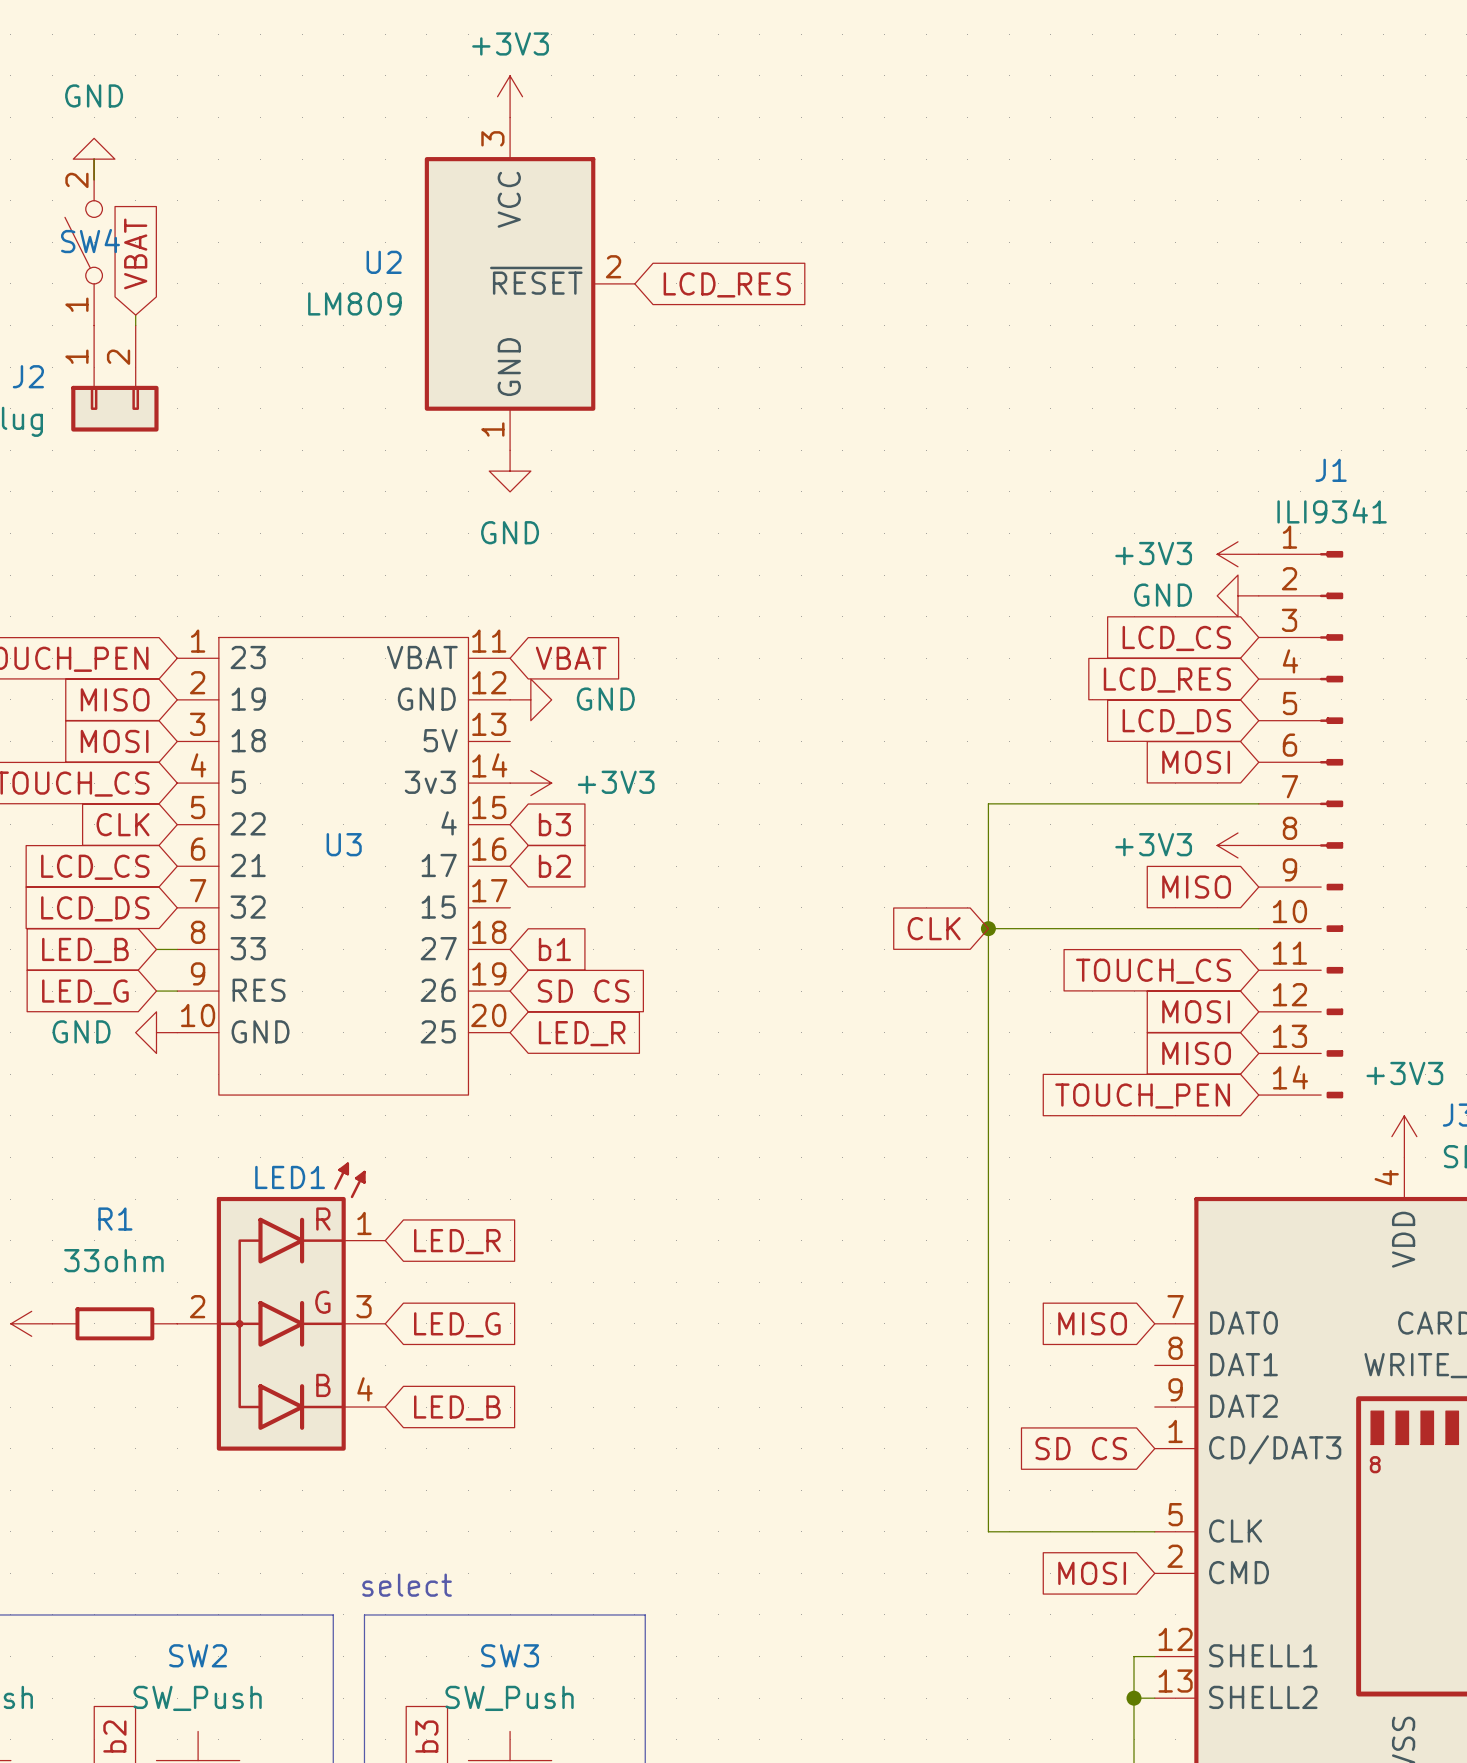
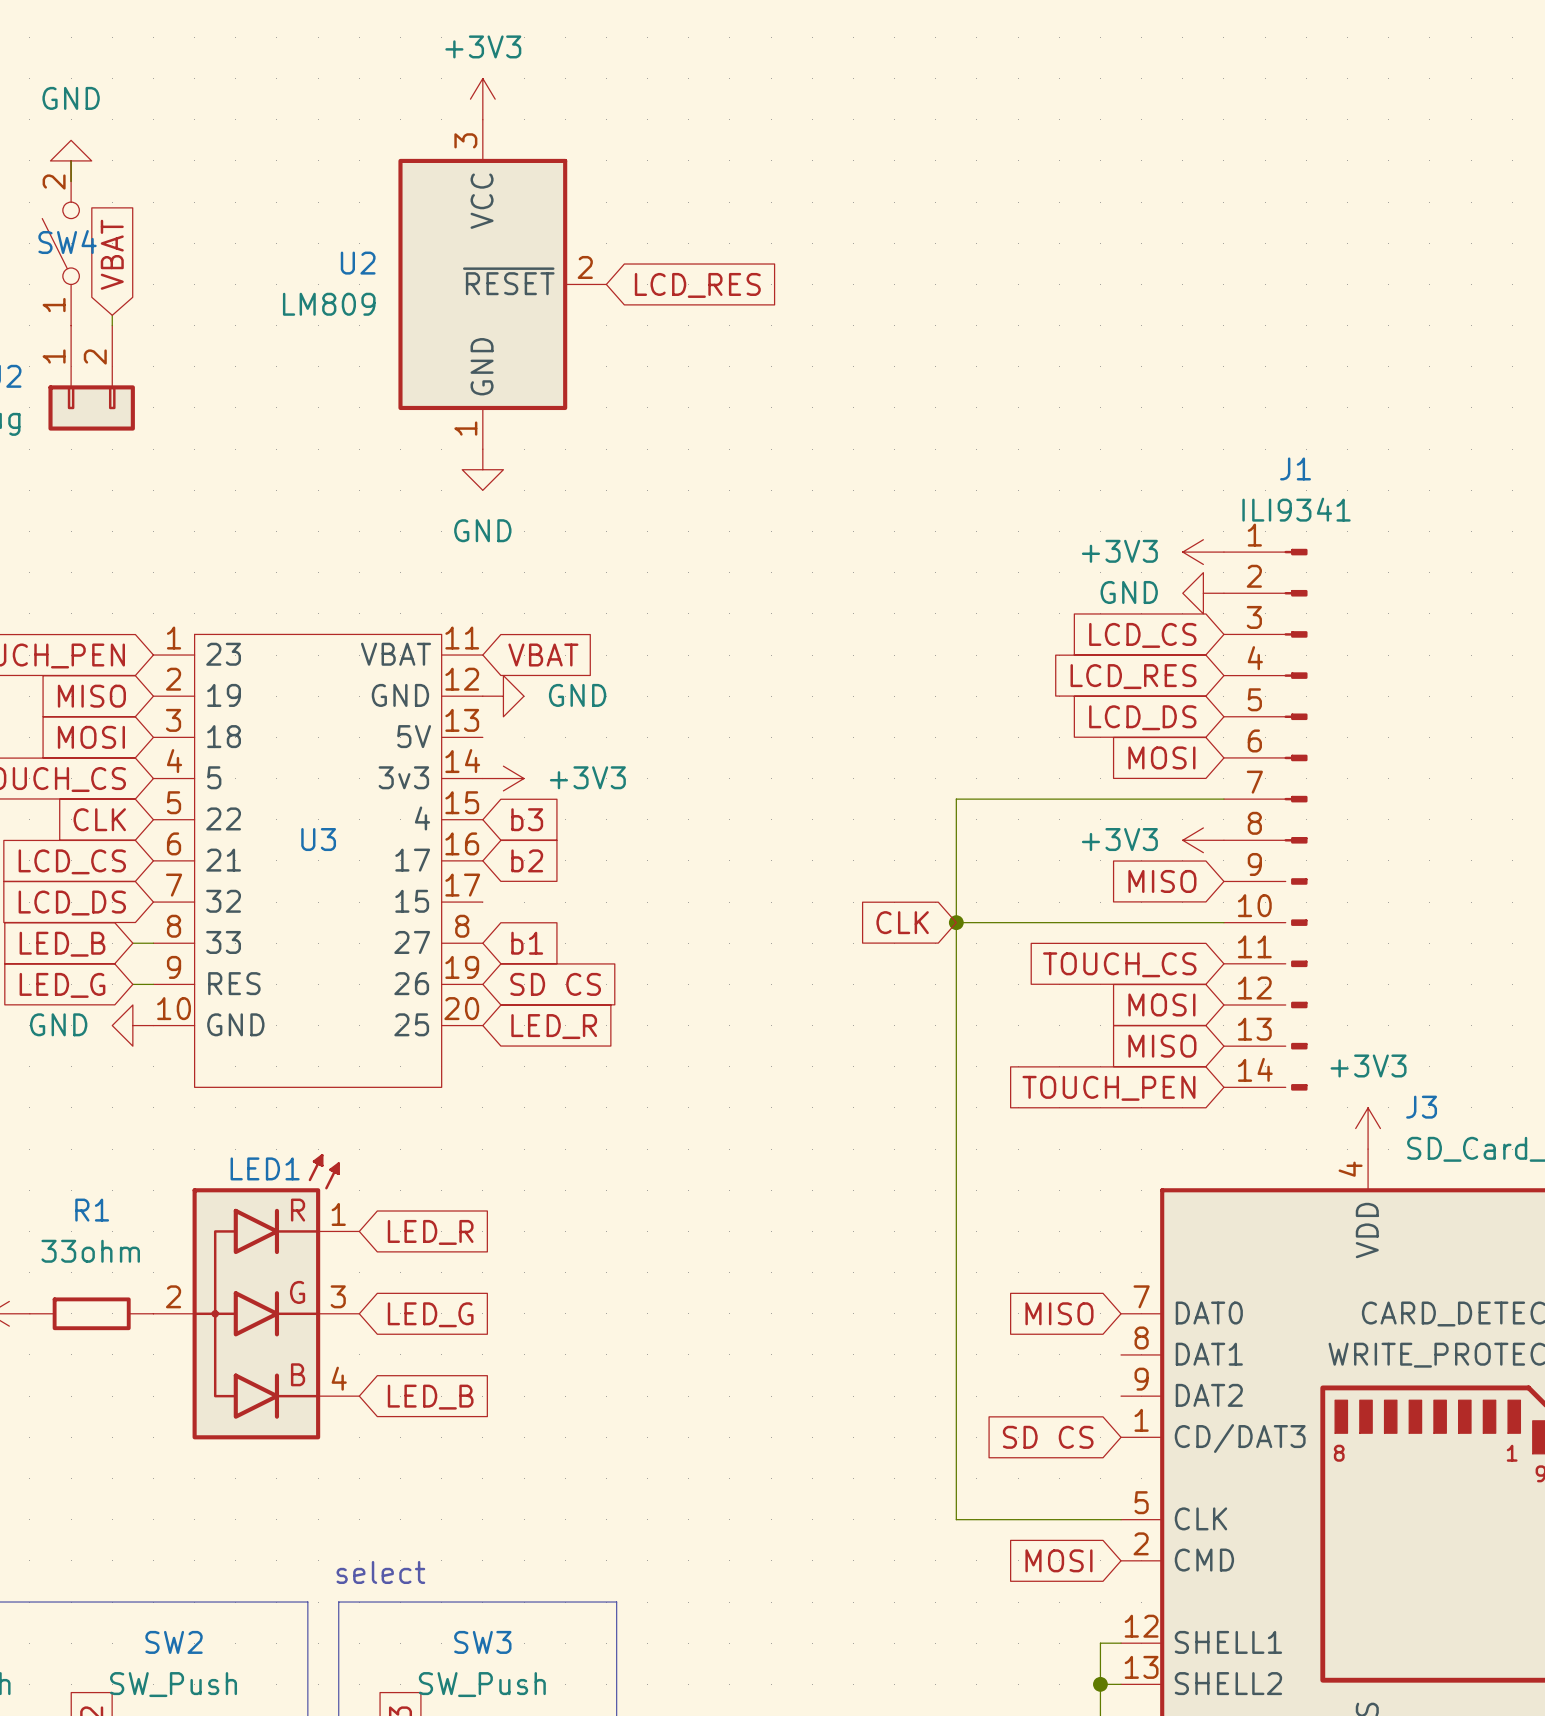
U3 pin number: 18 (489, 932) -> 8 (462, 926)

